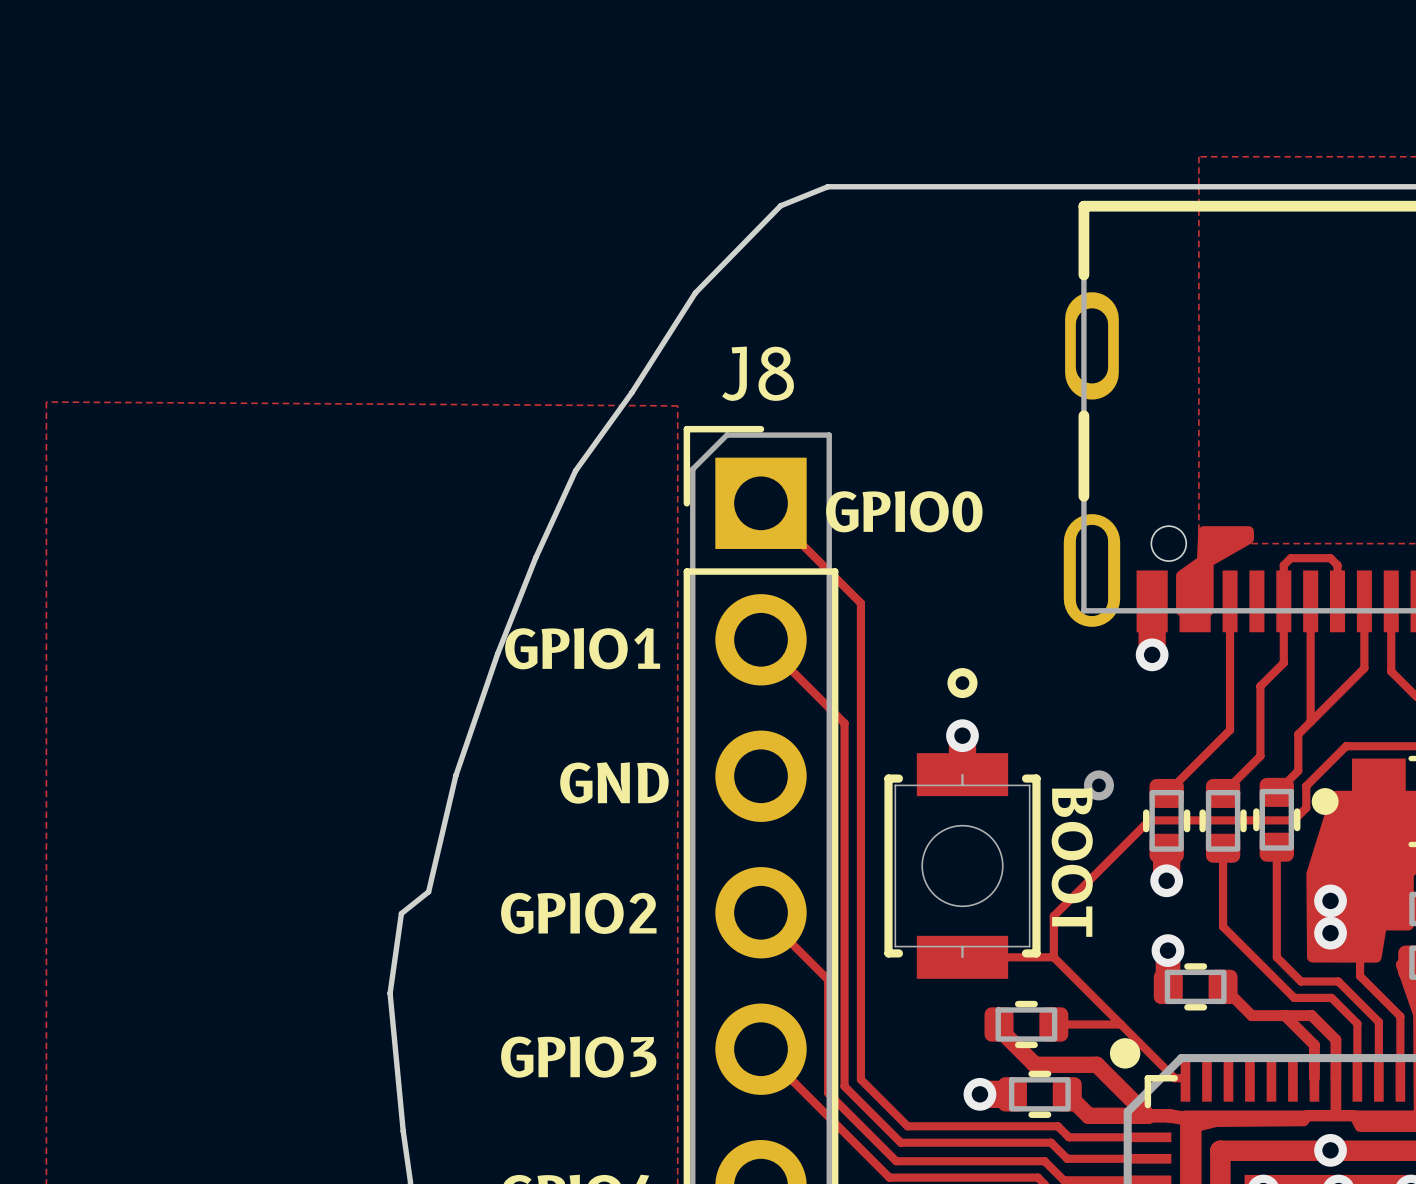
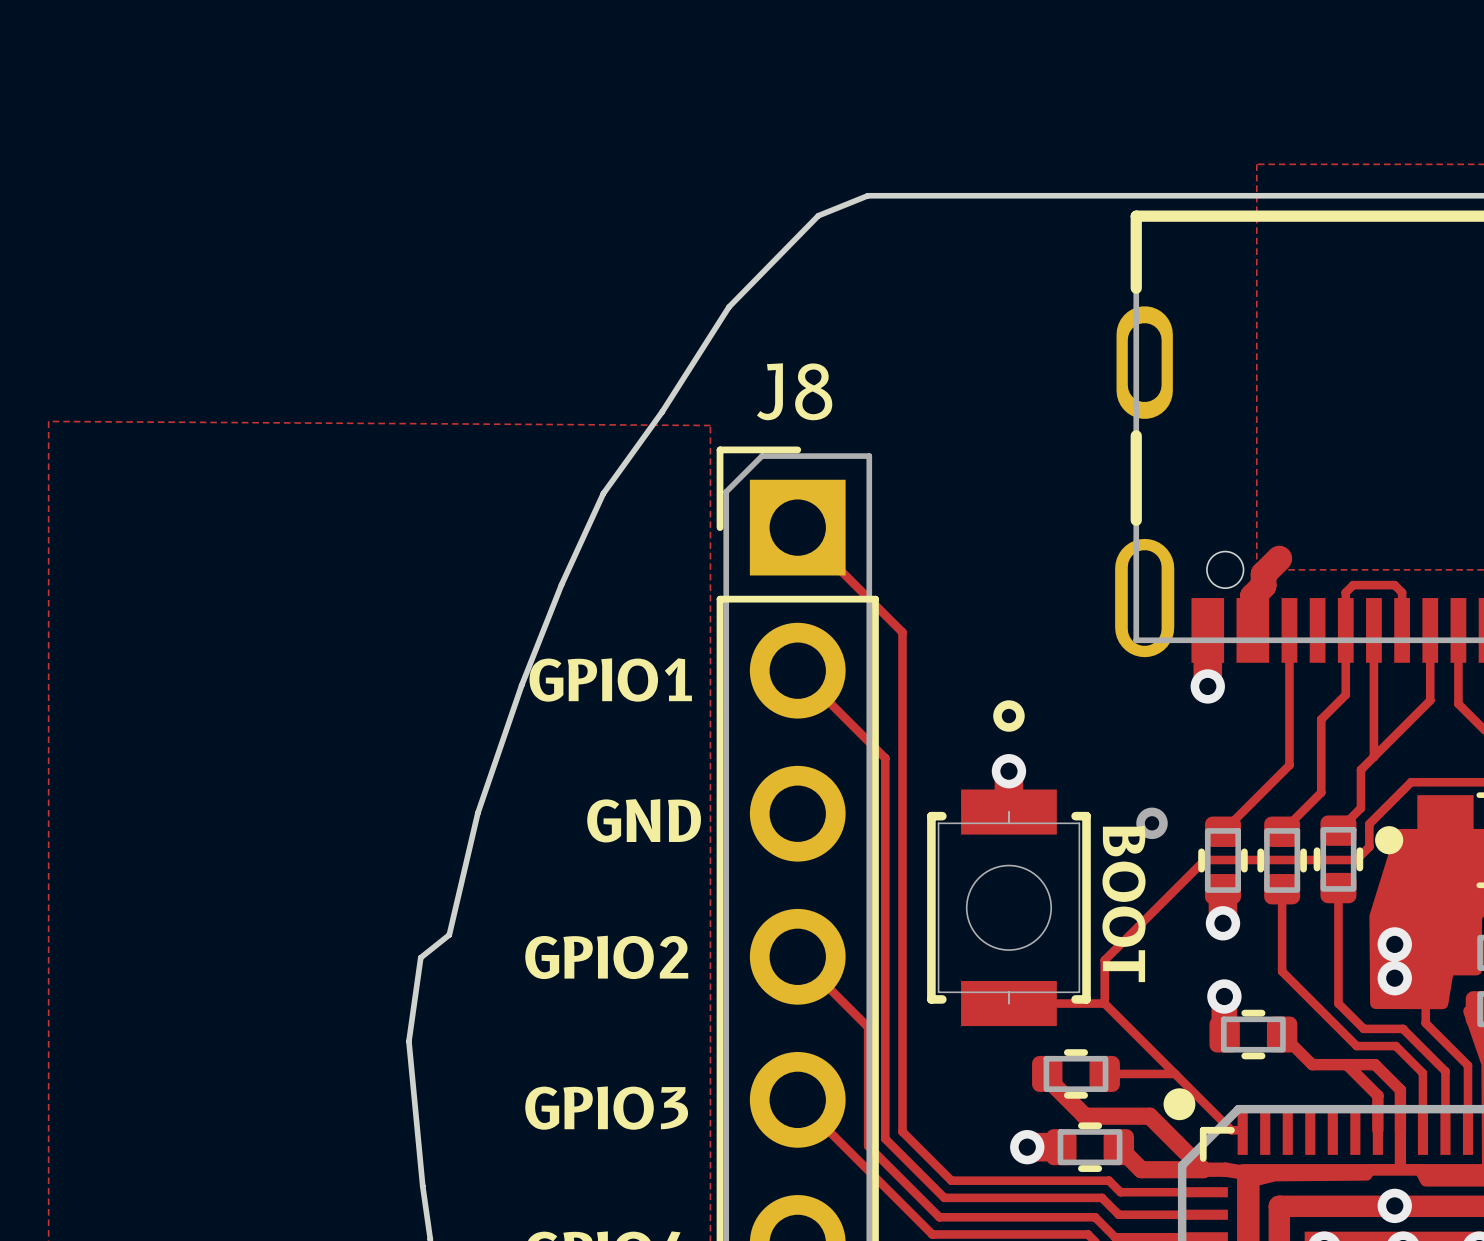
text: GPIO0 (904, 511) -> none
drawing: [1176, 526, 1254, 617] -> none
track: none -> (1279, 558) (1263, 574) (1263, 585) (1252, 596) (1252, 630)

